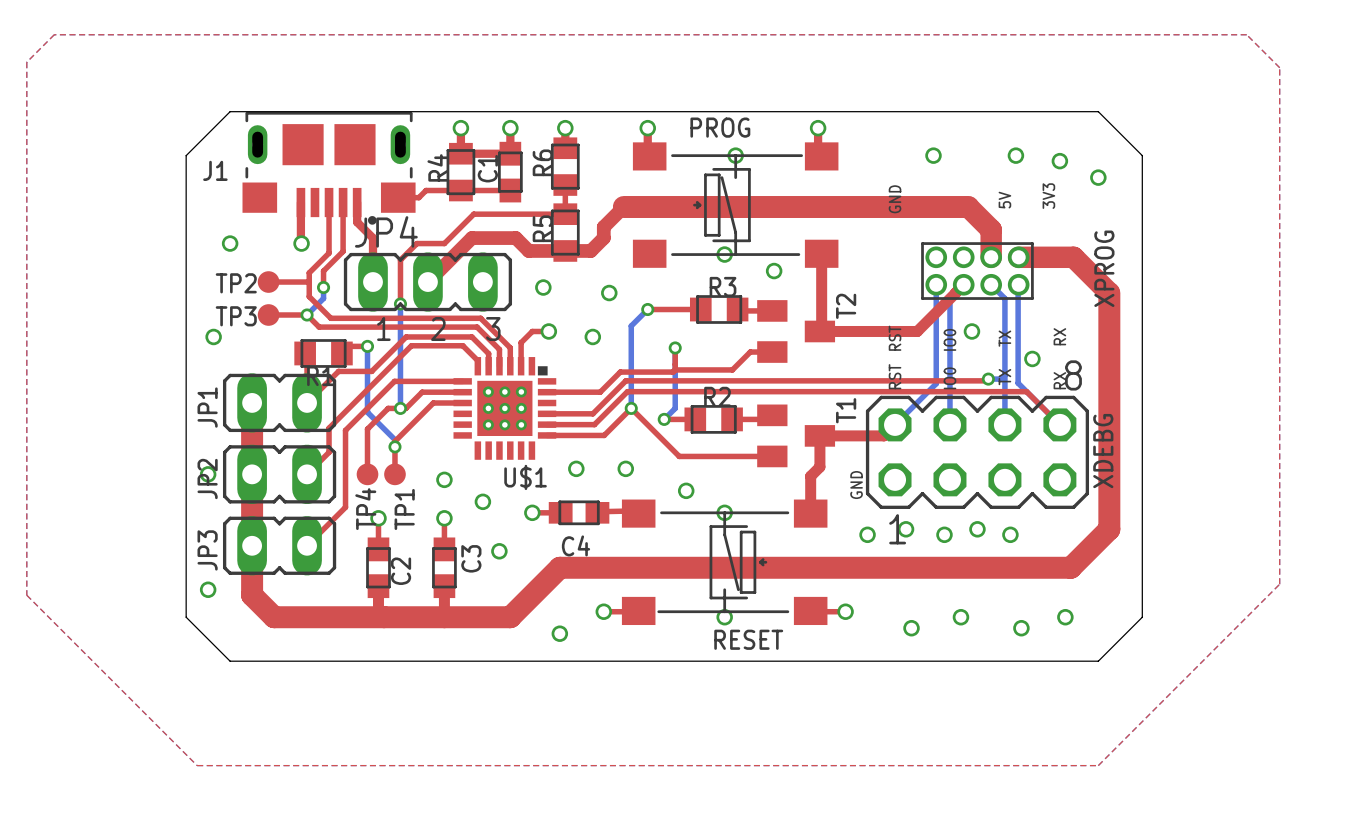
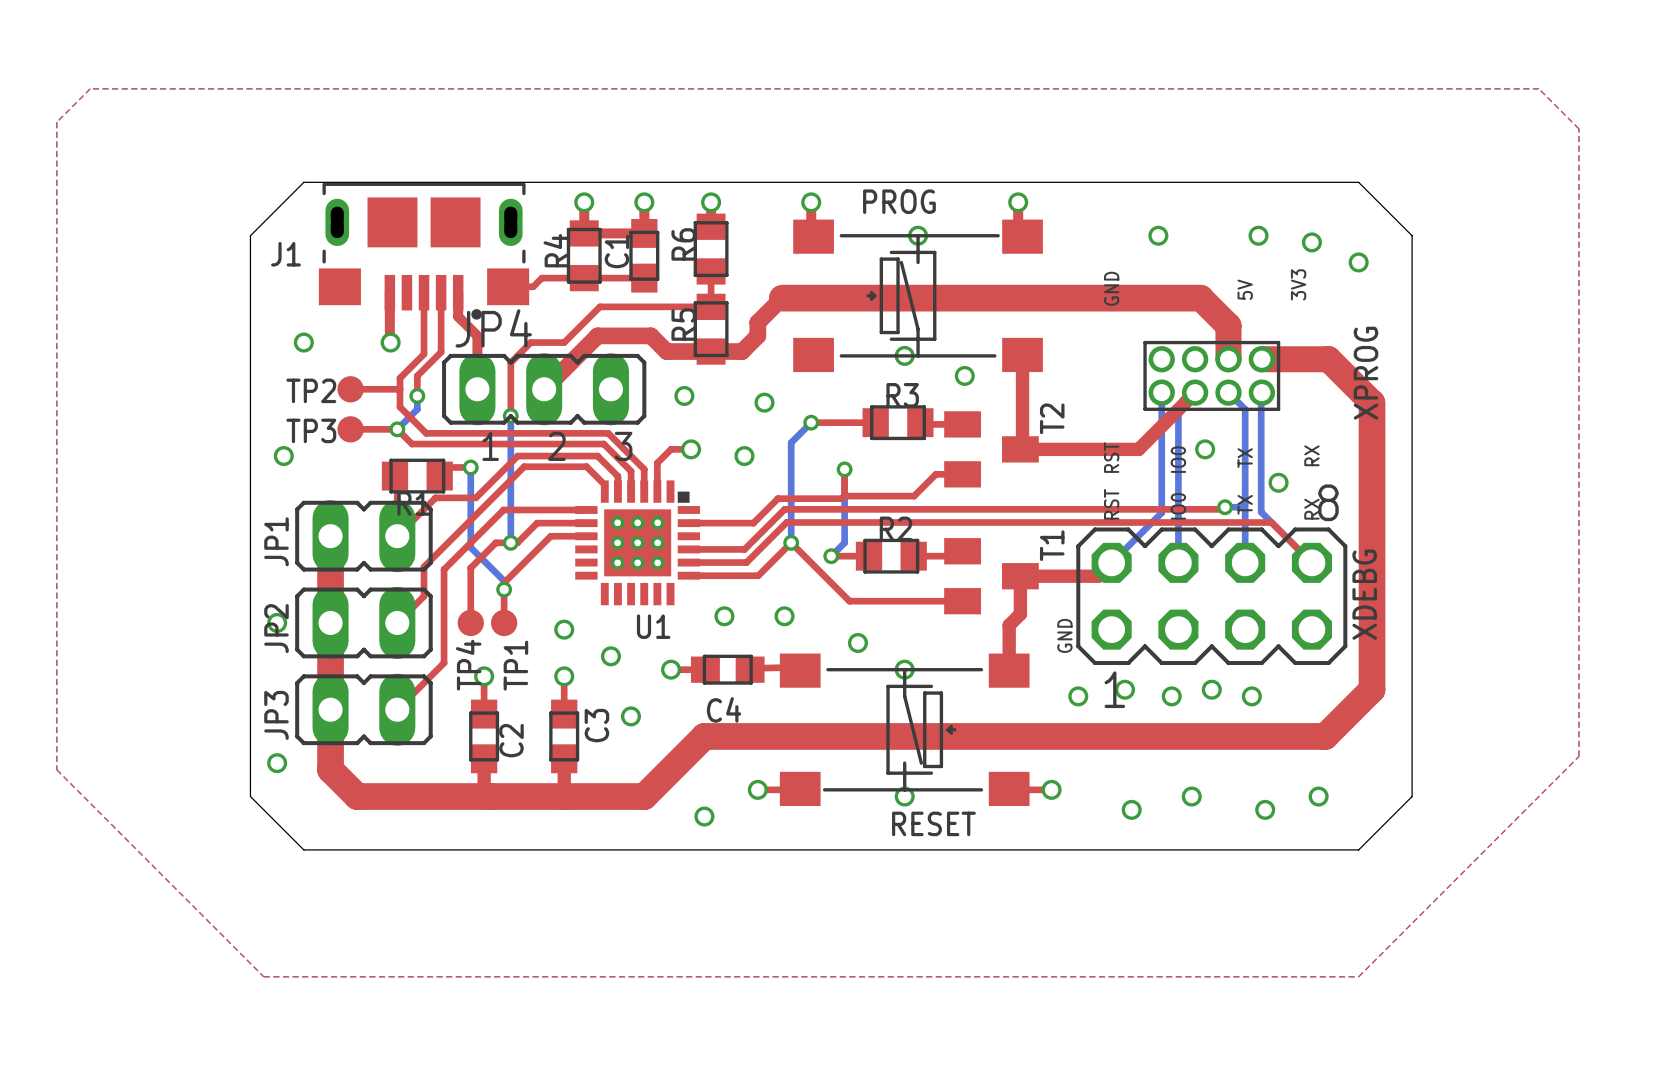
U$1 name: U$1 (525, 477) -> U1 (653, 626)

